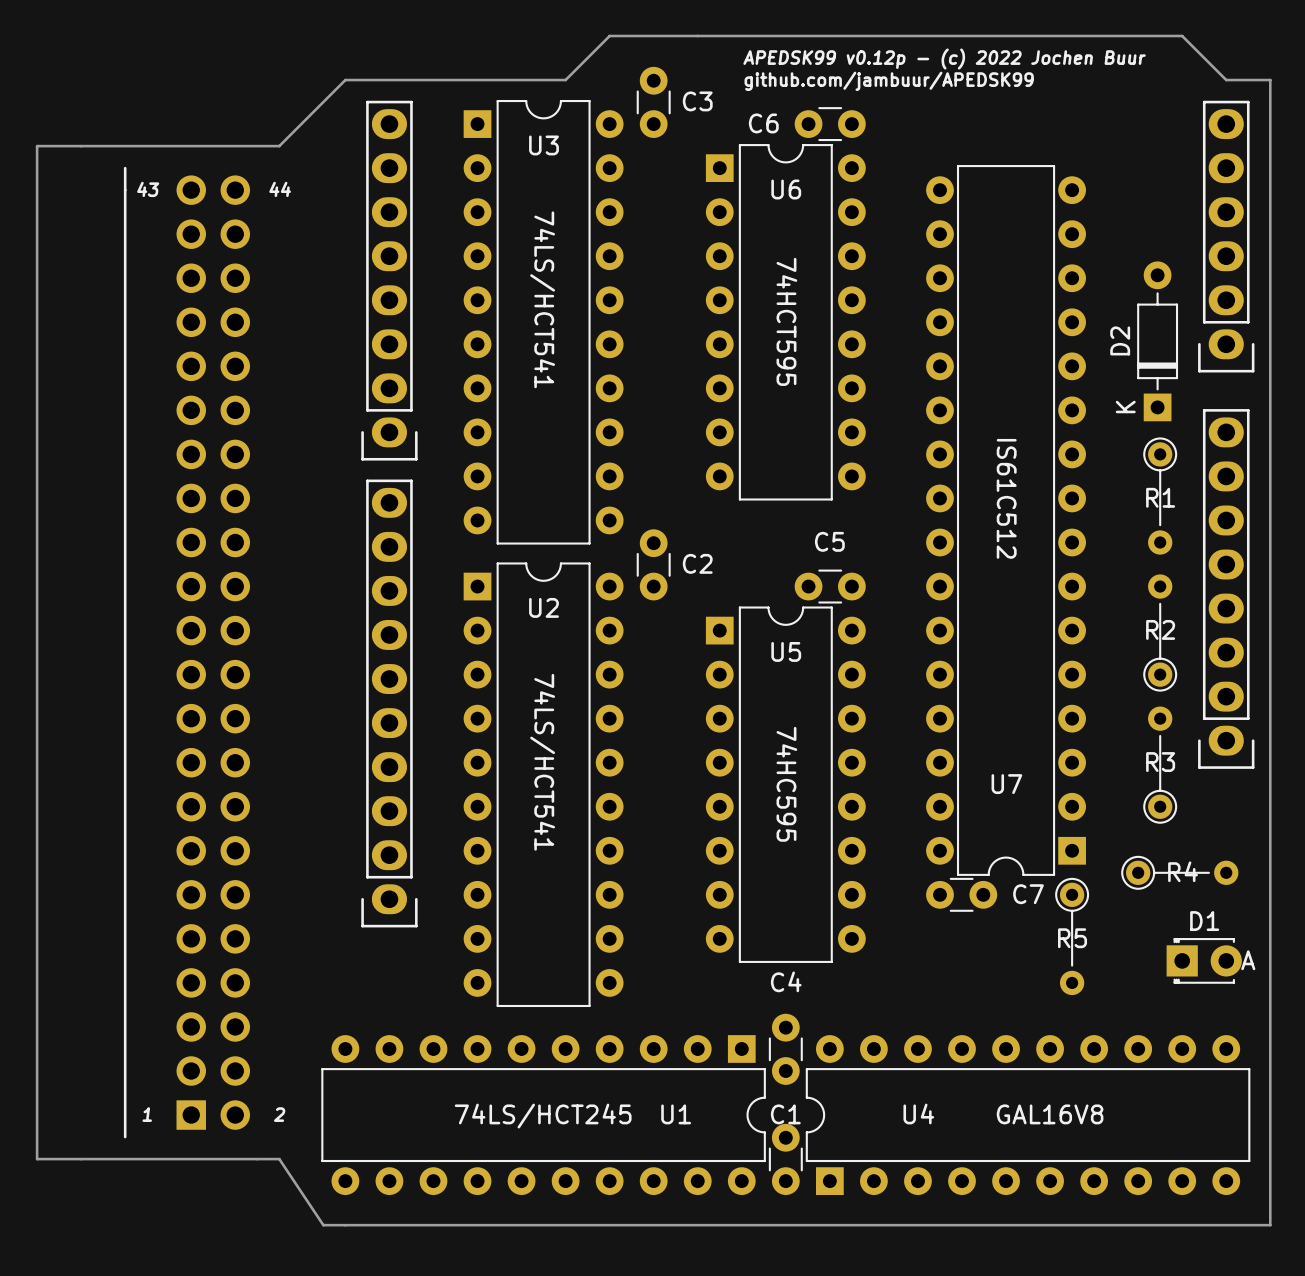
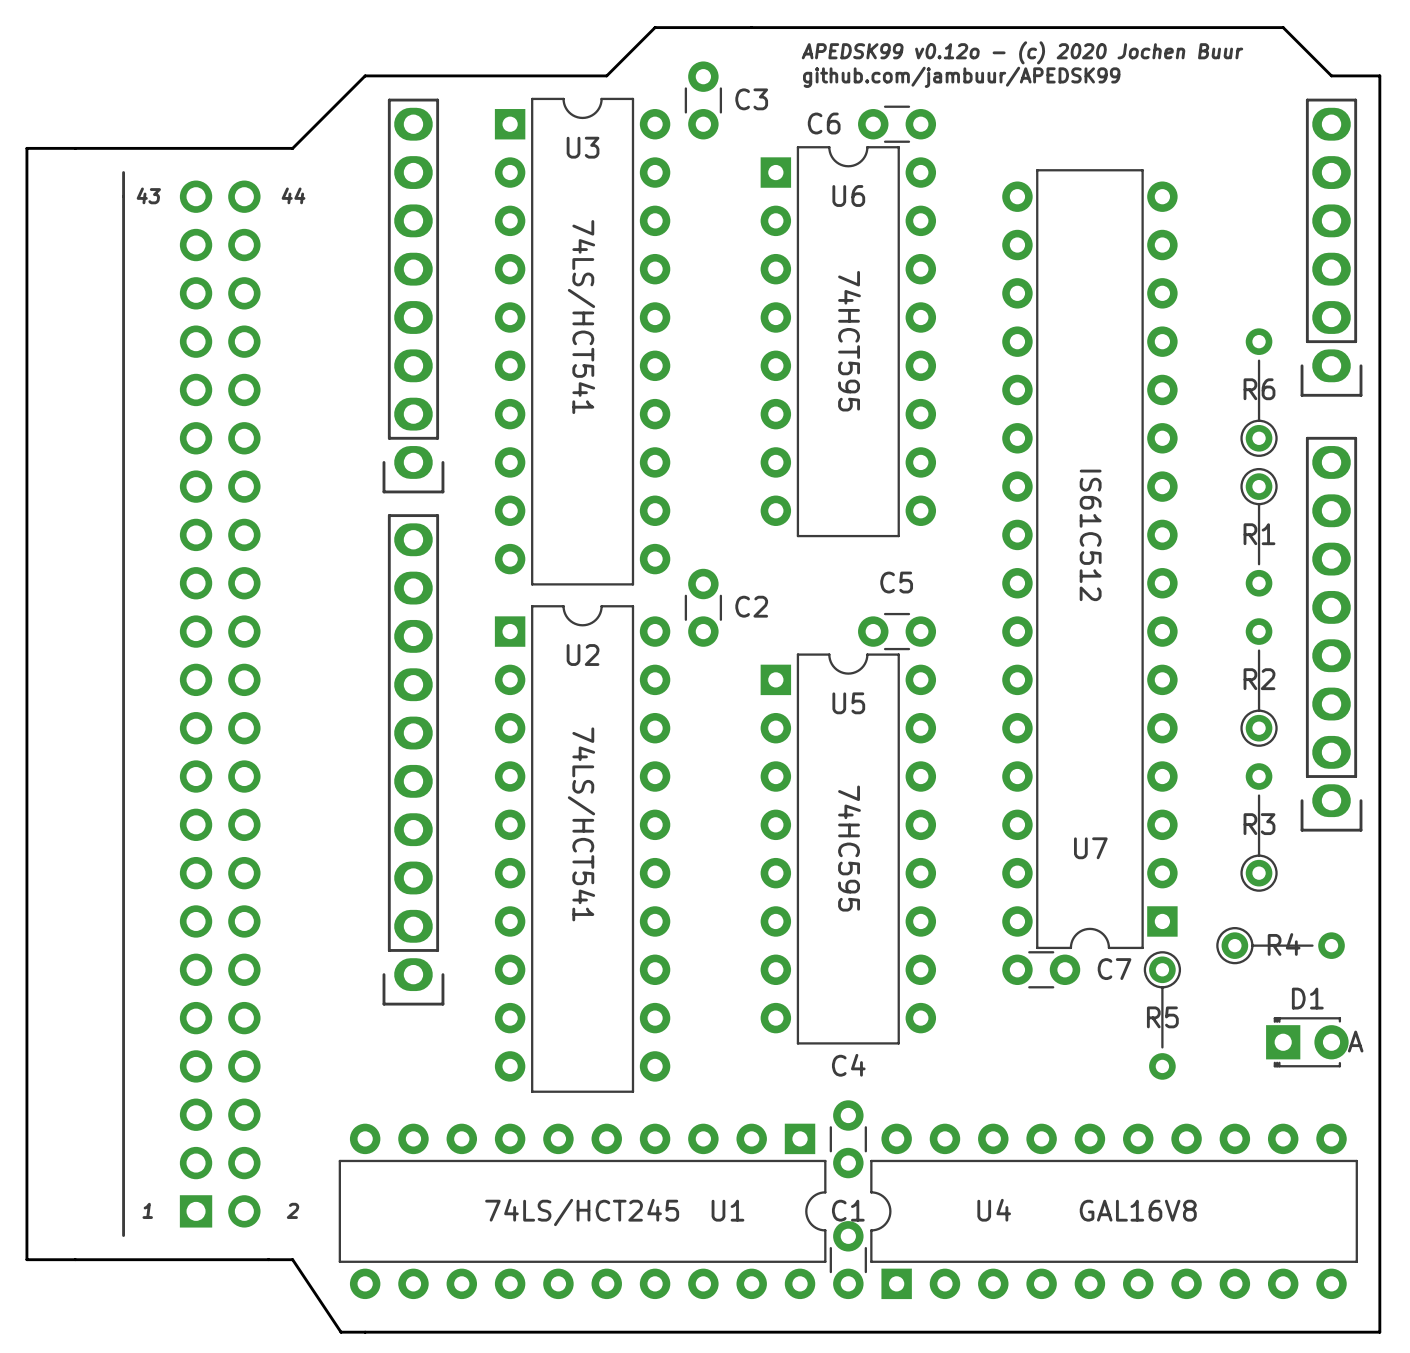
text: APEDSK99 v0.12p - (c) 2022 Jochen Buur (944, 59) -> APEDSK99 v0.12o - (c) 2020 Jochen Buur (1022, 52)
D2: (1157, 341) -> none
R6: none -> (1259, 392)

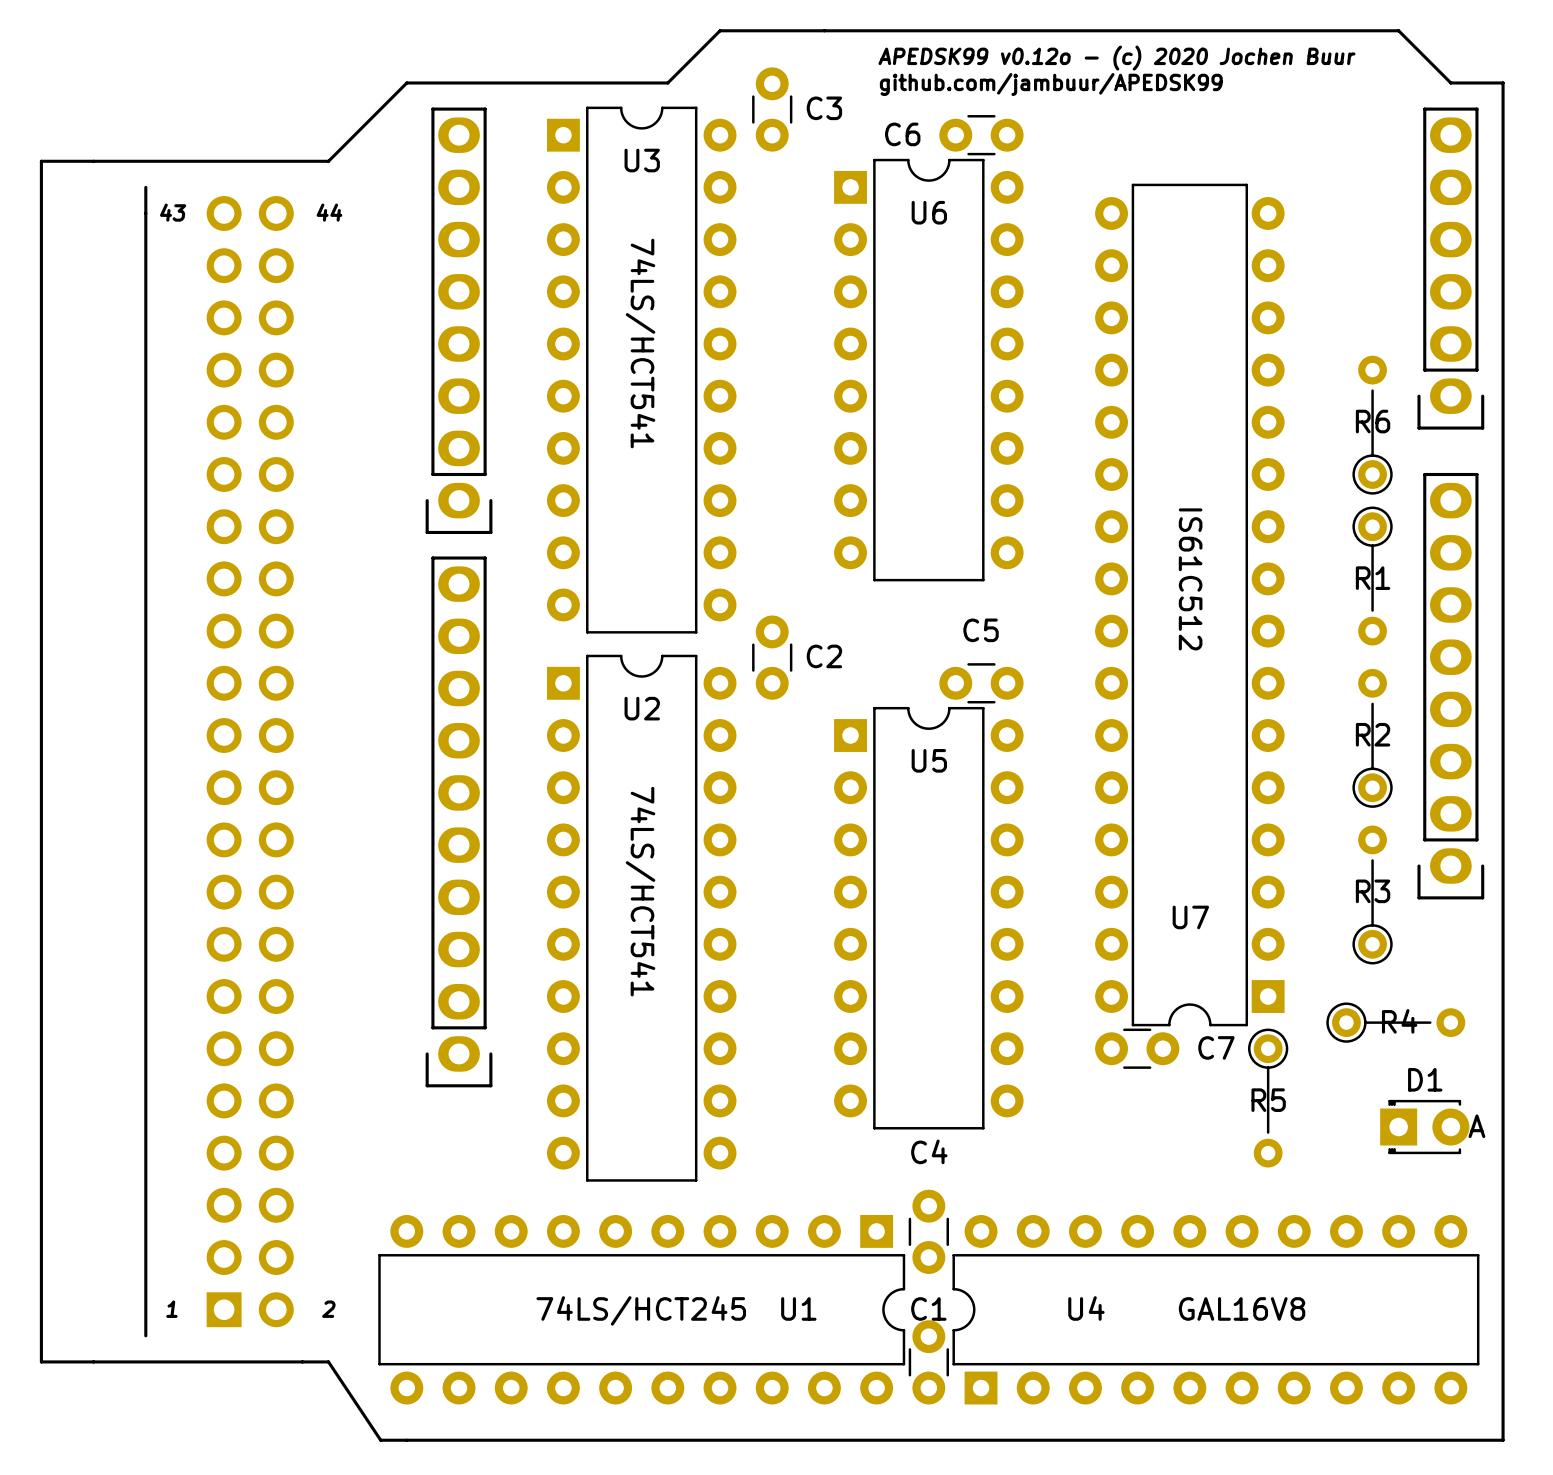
text: 74HCT595 (849, 341) -> none
text: 74HC595 (849, 848) -> none

